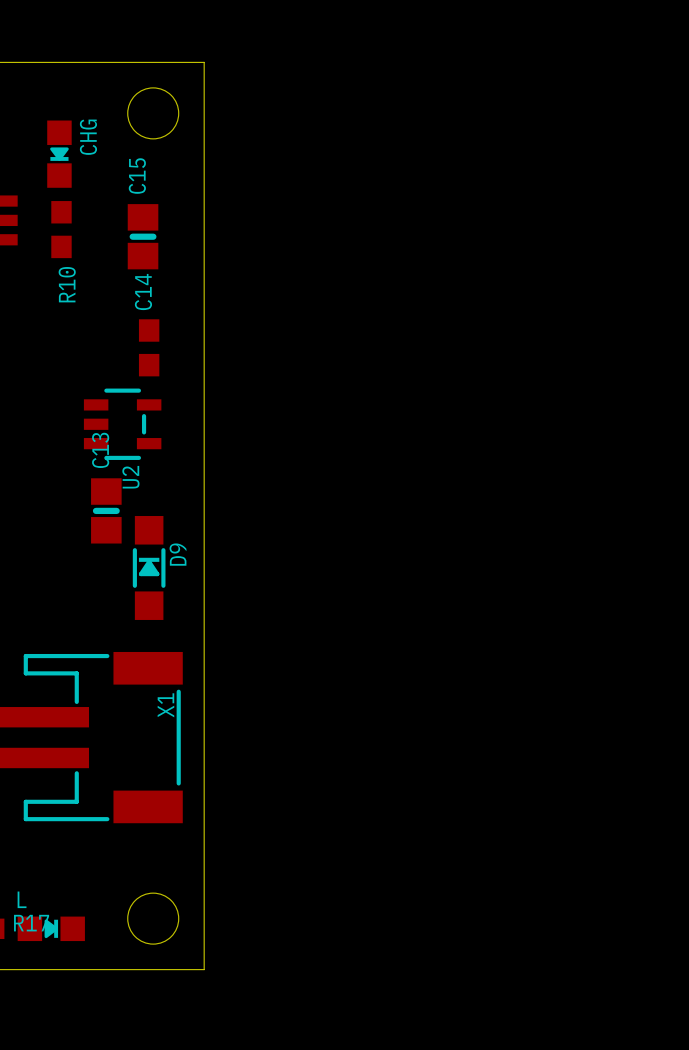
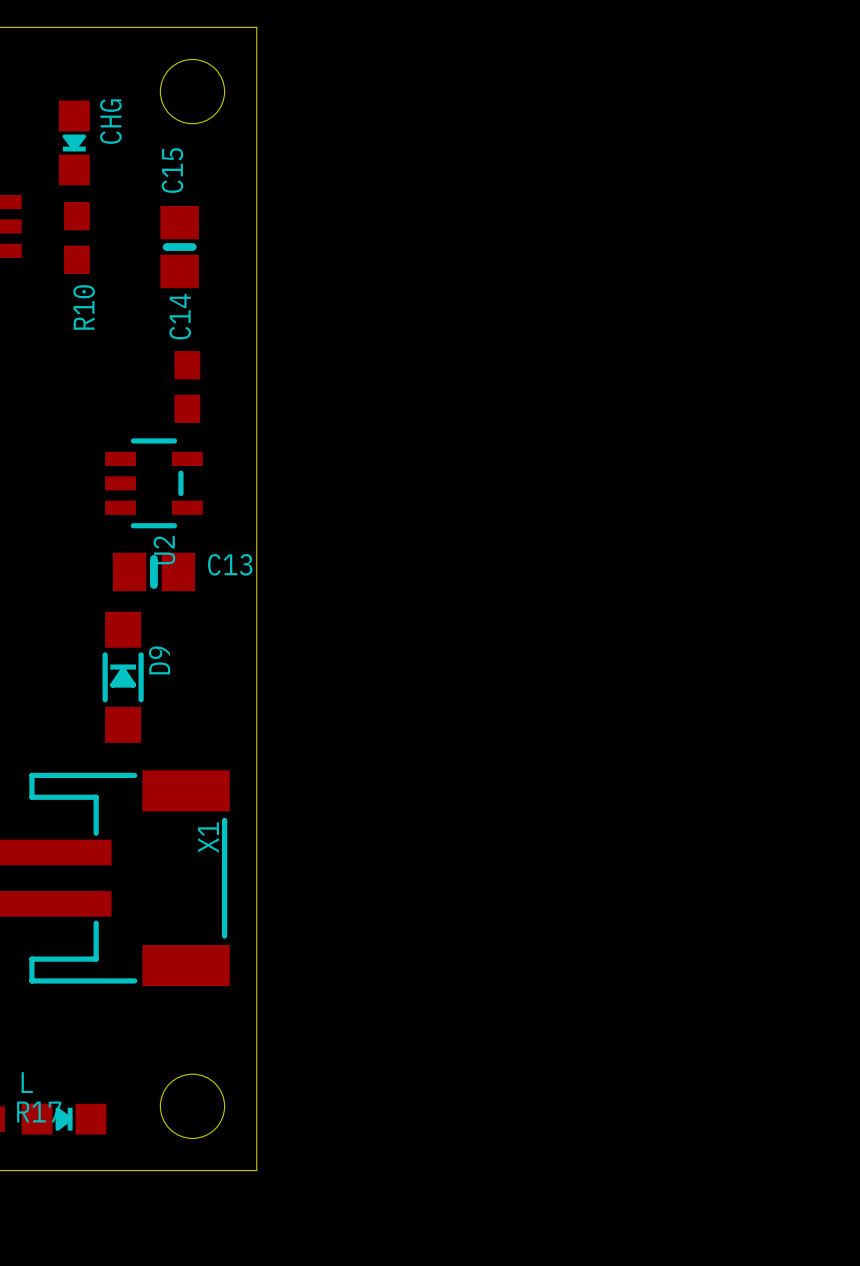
C13 rotation: 0° (106, 510) -> 90° clockwise (153, 571)
D9 position: (149, 567) -> (123, 677)

